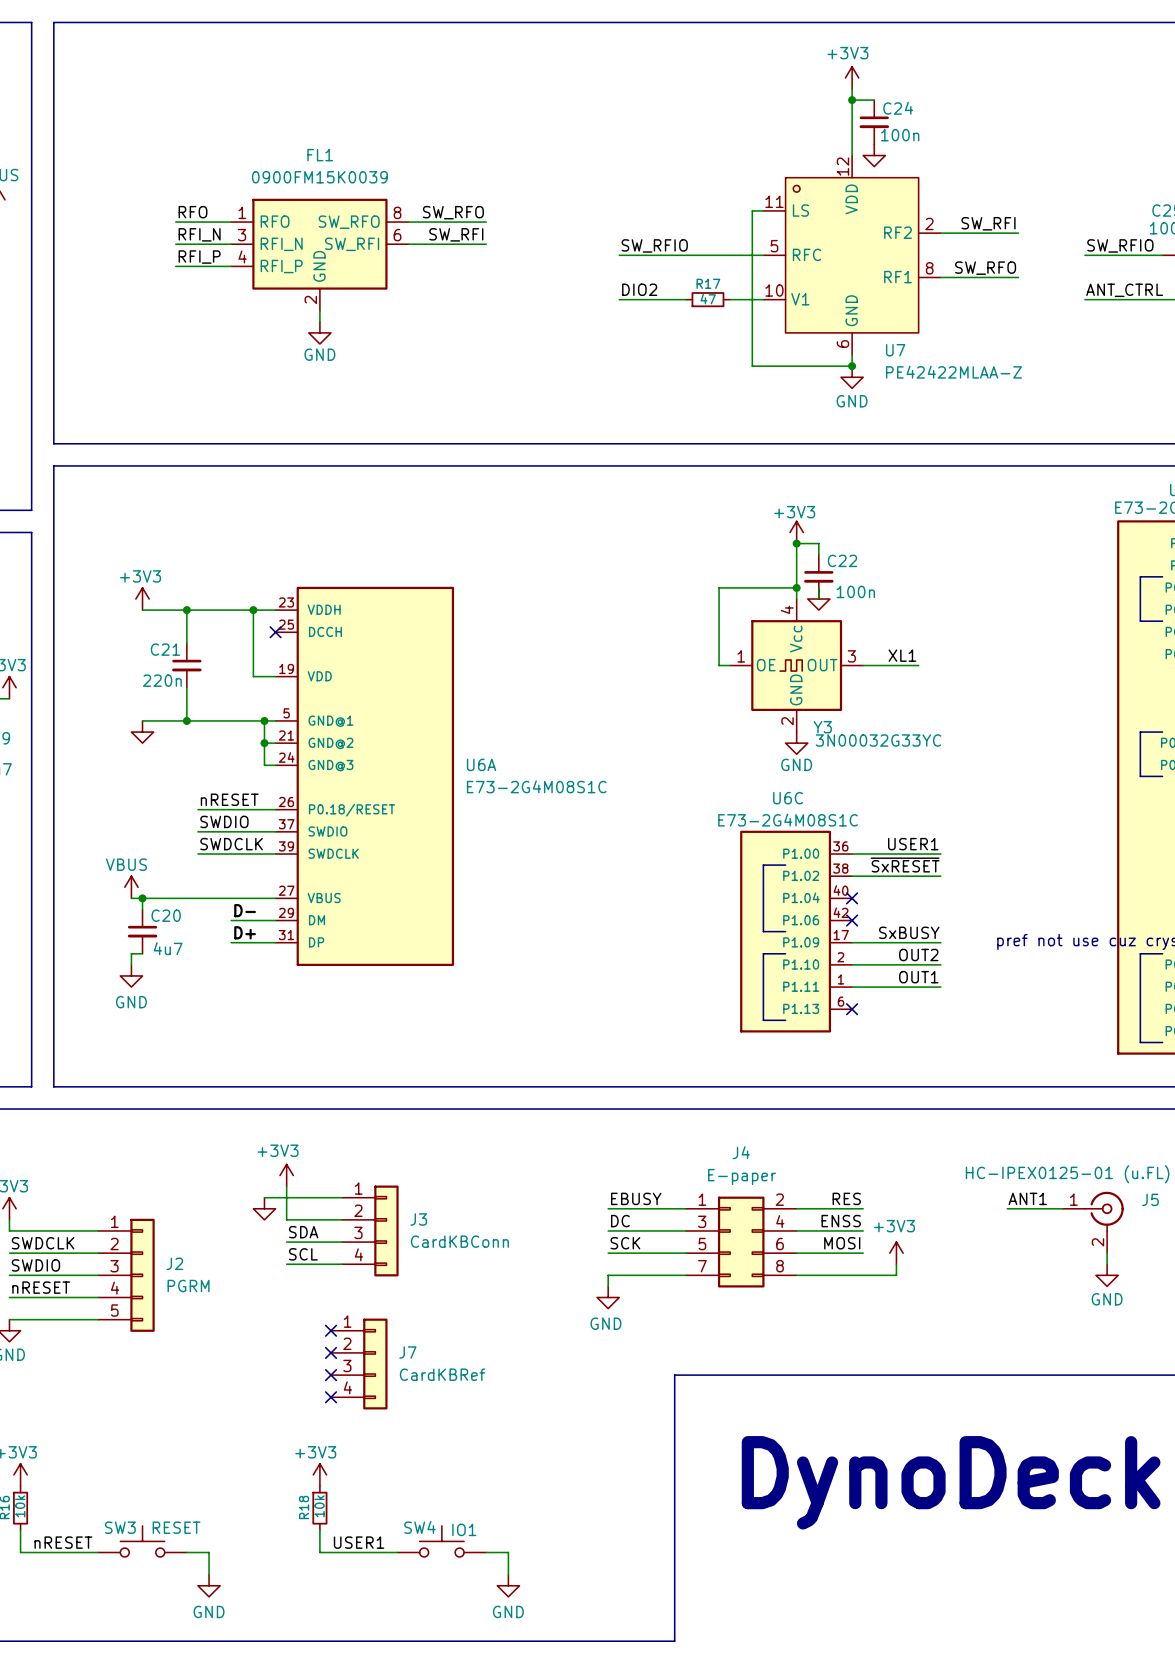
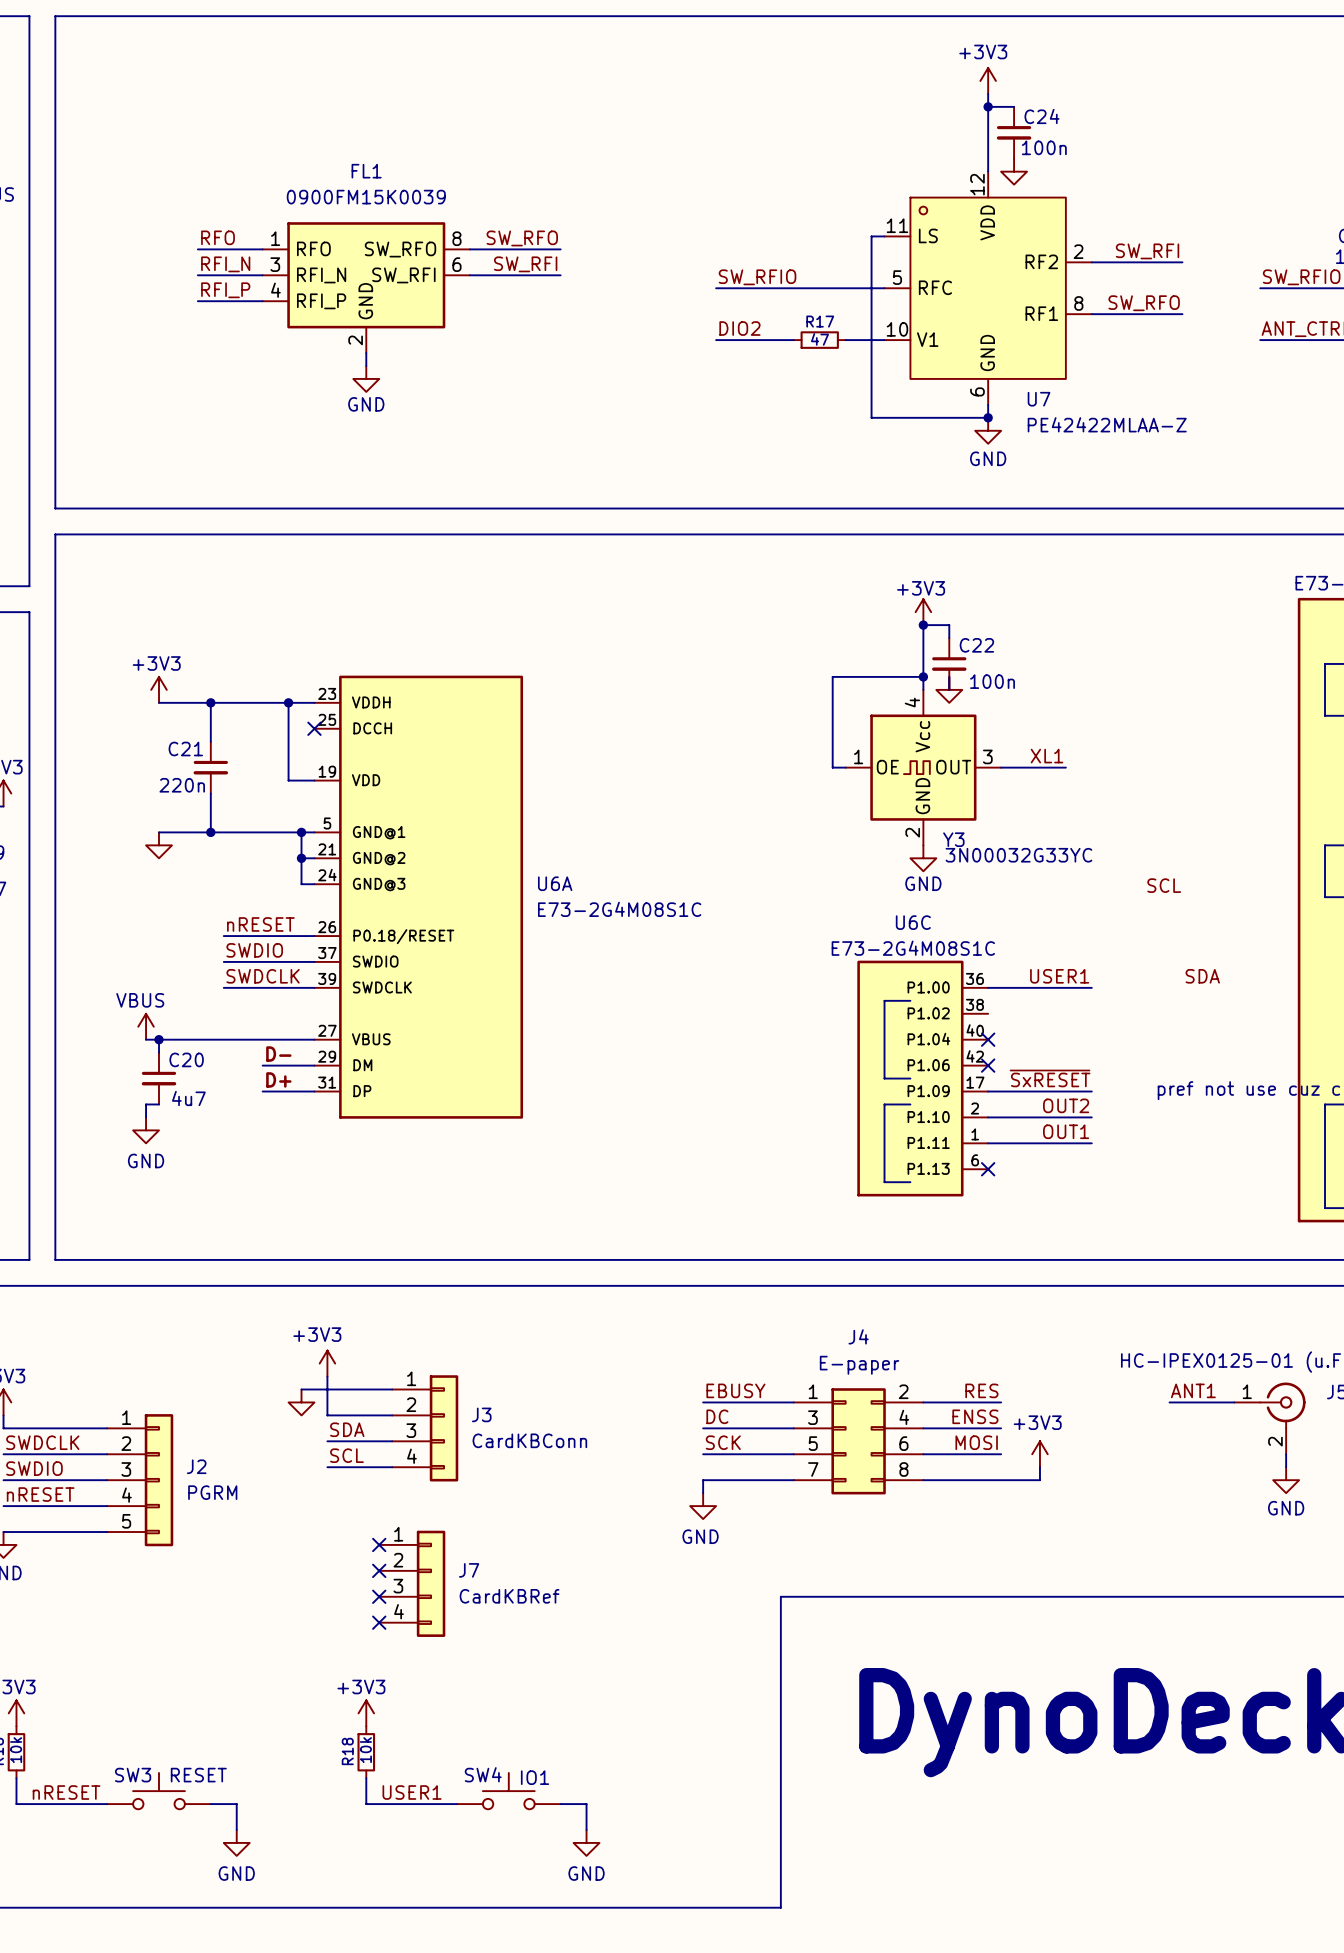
label: none -> SCL (1164, 885)
label: none -> SDA (1202, 976)
label: ~{SxRESET} (905, 865) -> none
wire: (852, 876) (940, 876) -> none
label: SxBUSY (909, 932) -> ~{SxRESET} (1050, 1078)

